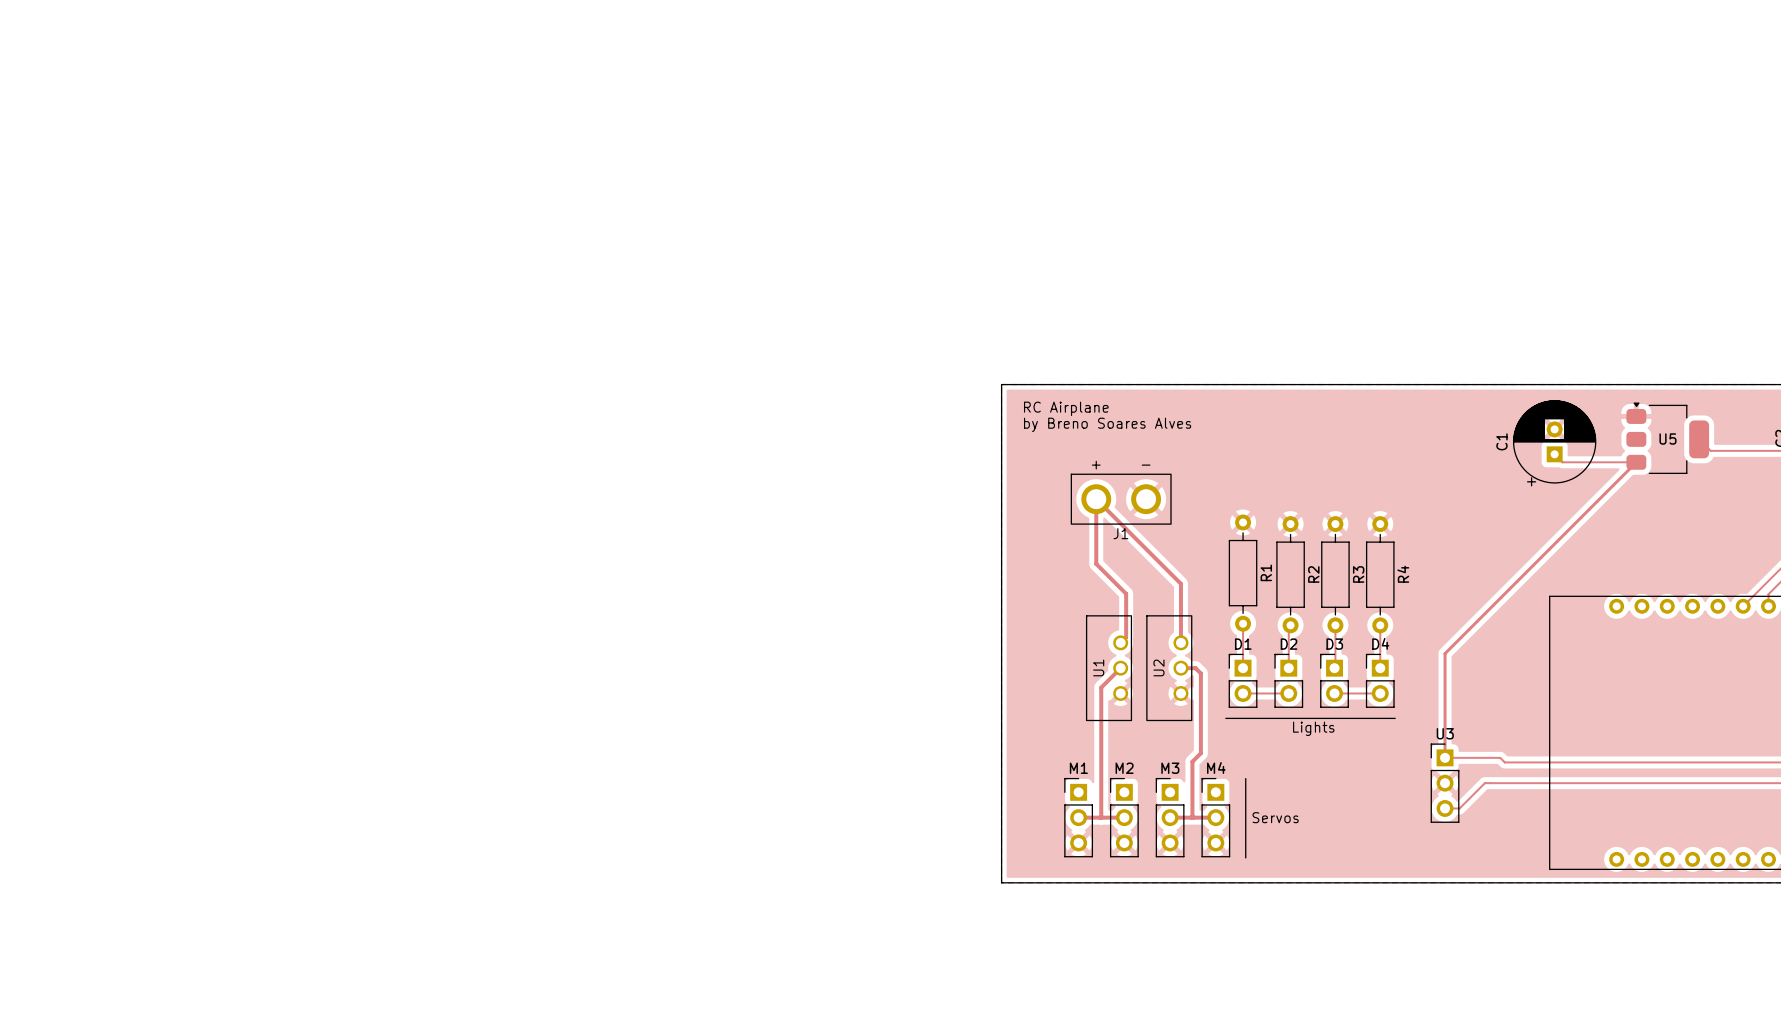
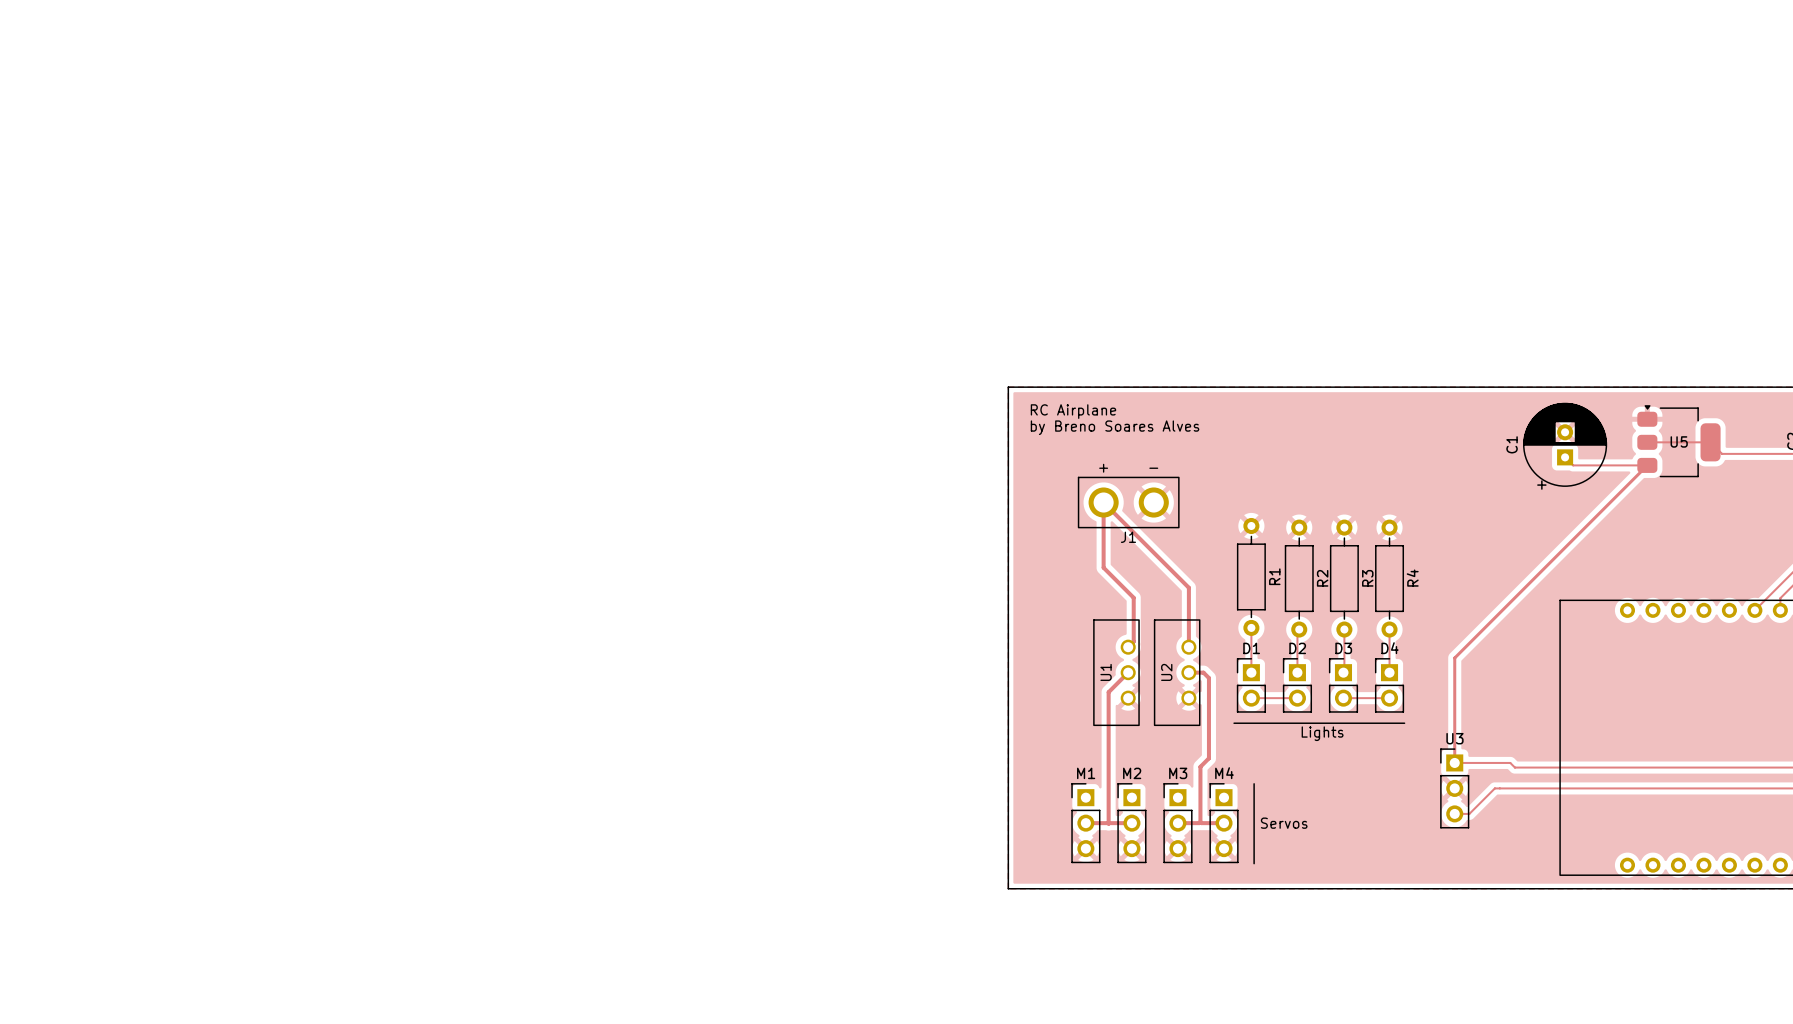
track: none -> (1647, 442) (1710, 442)

